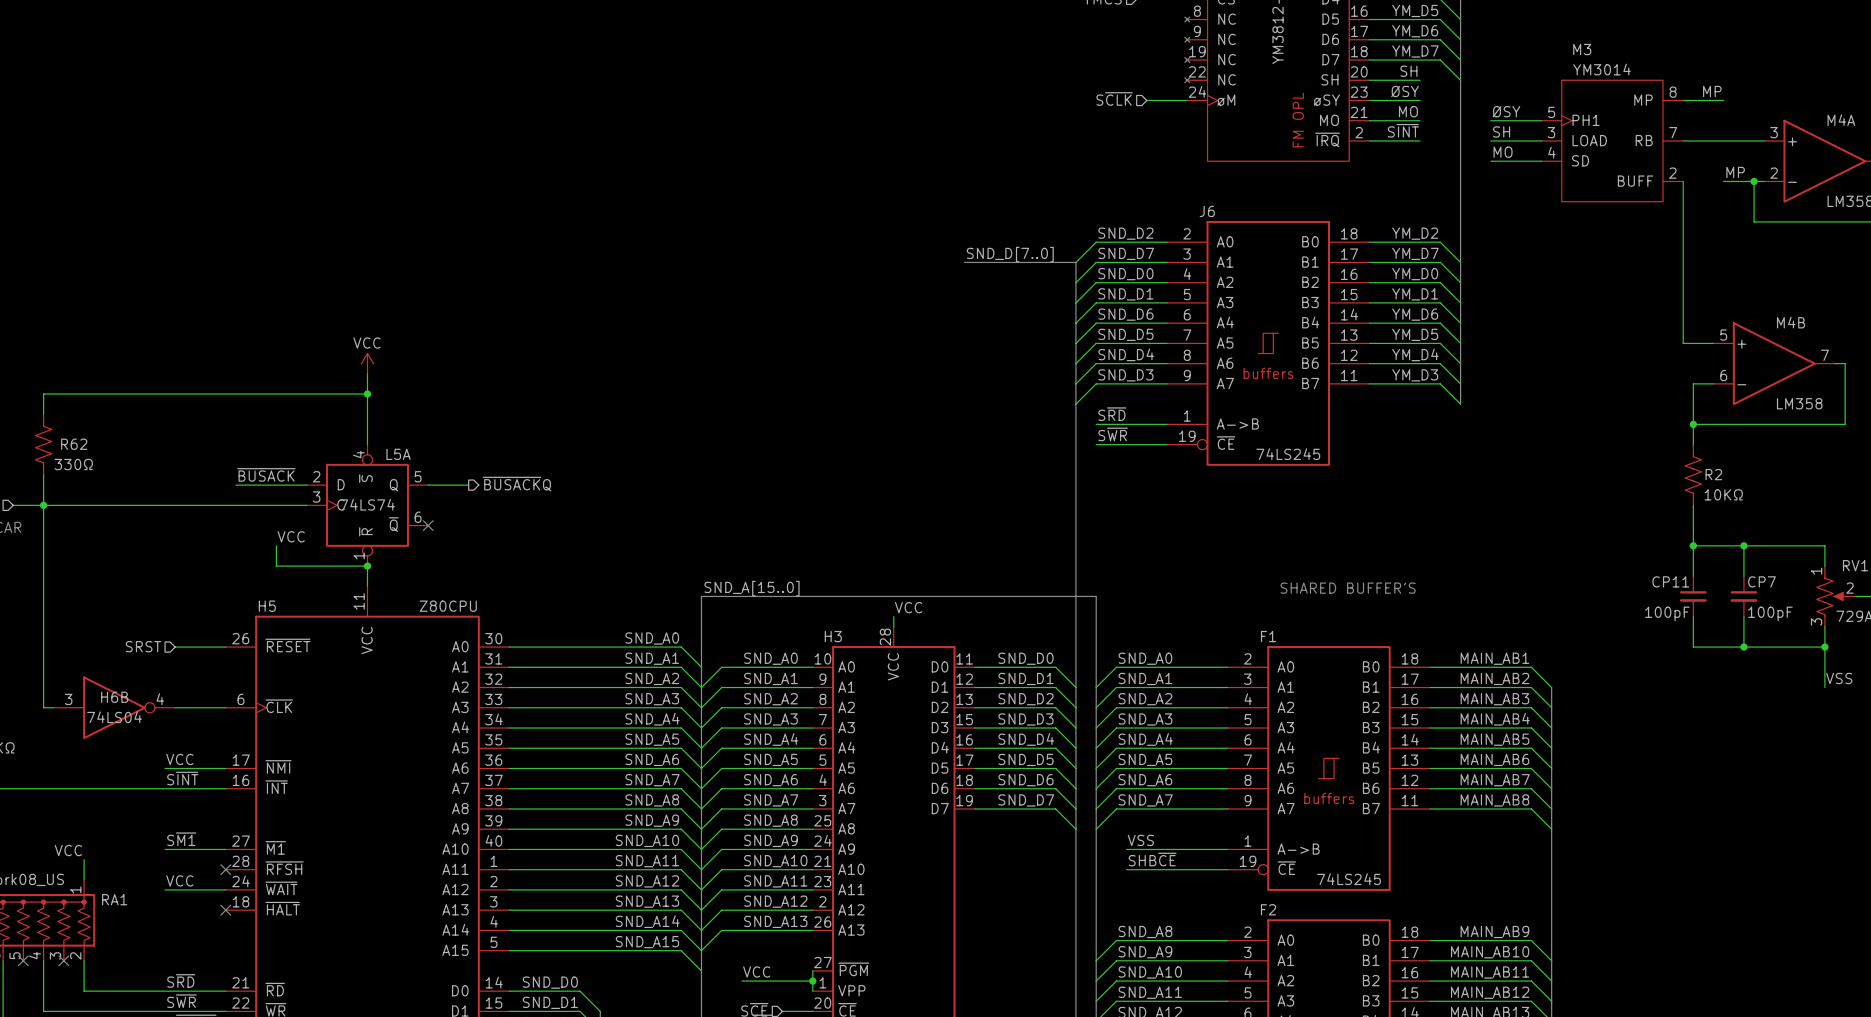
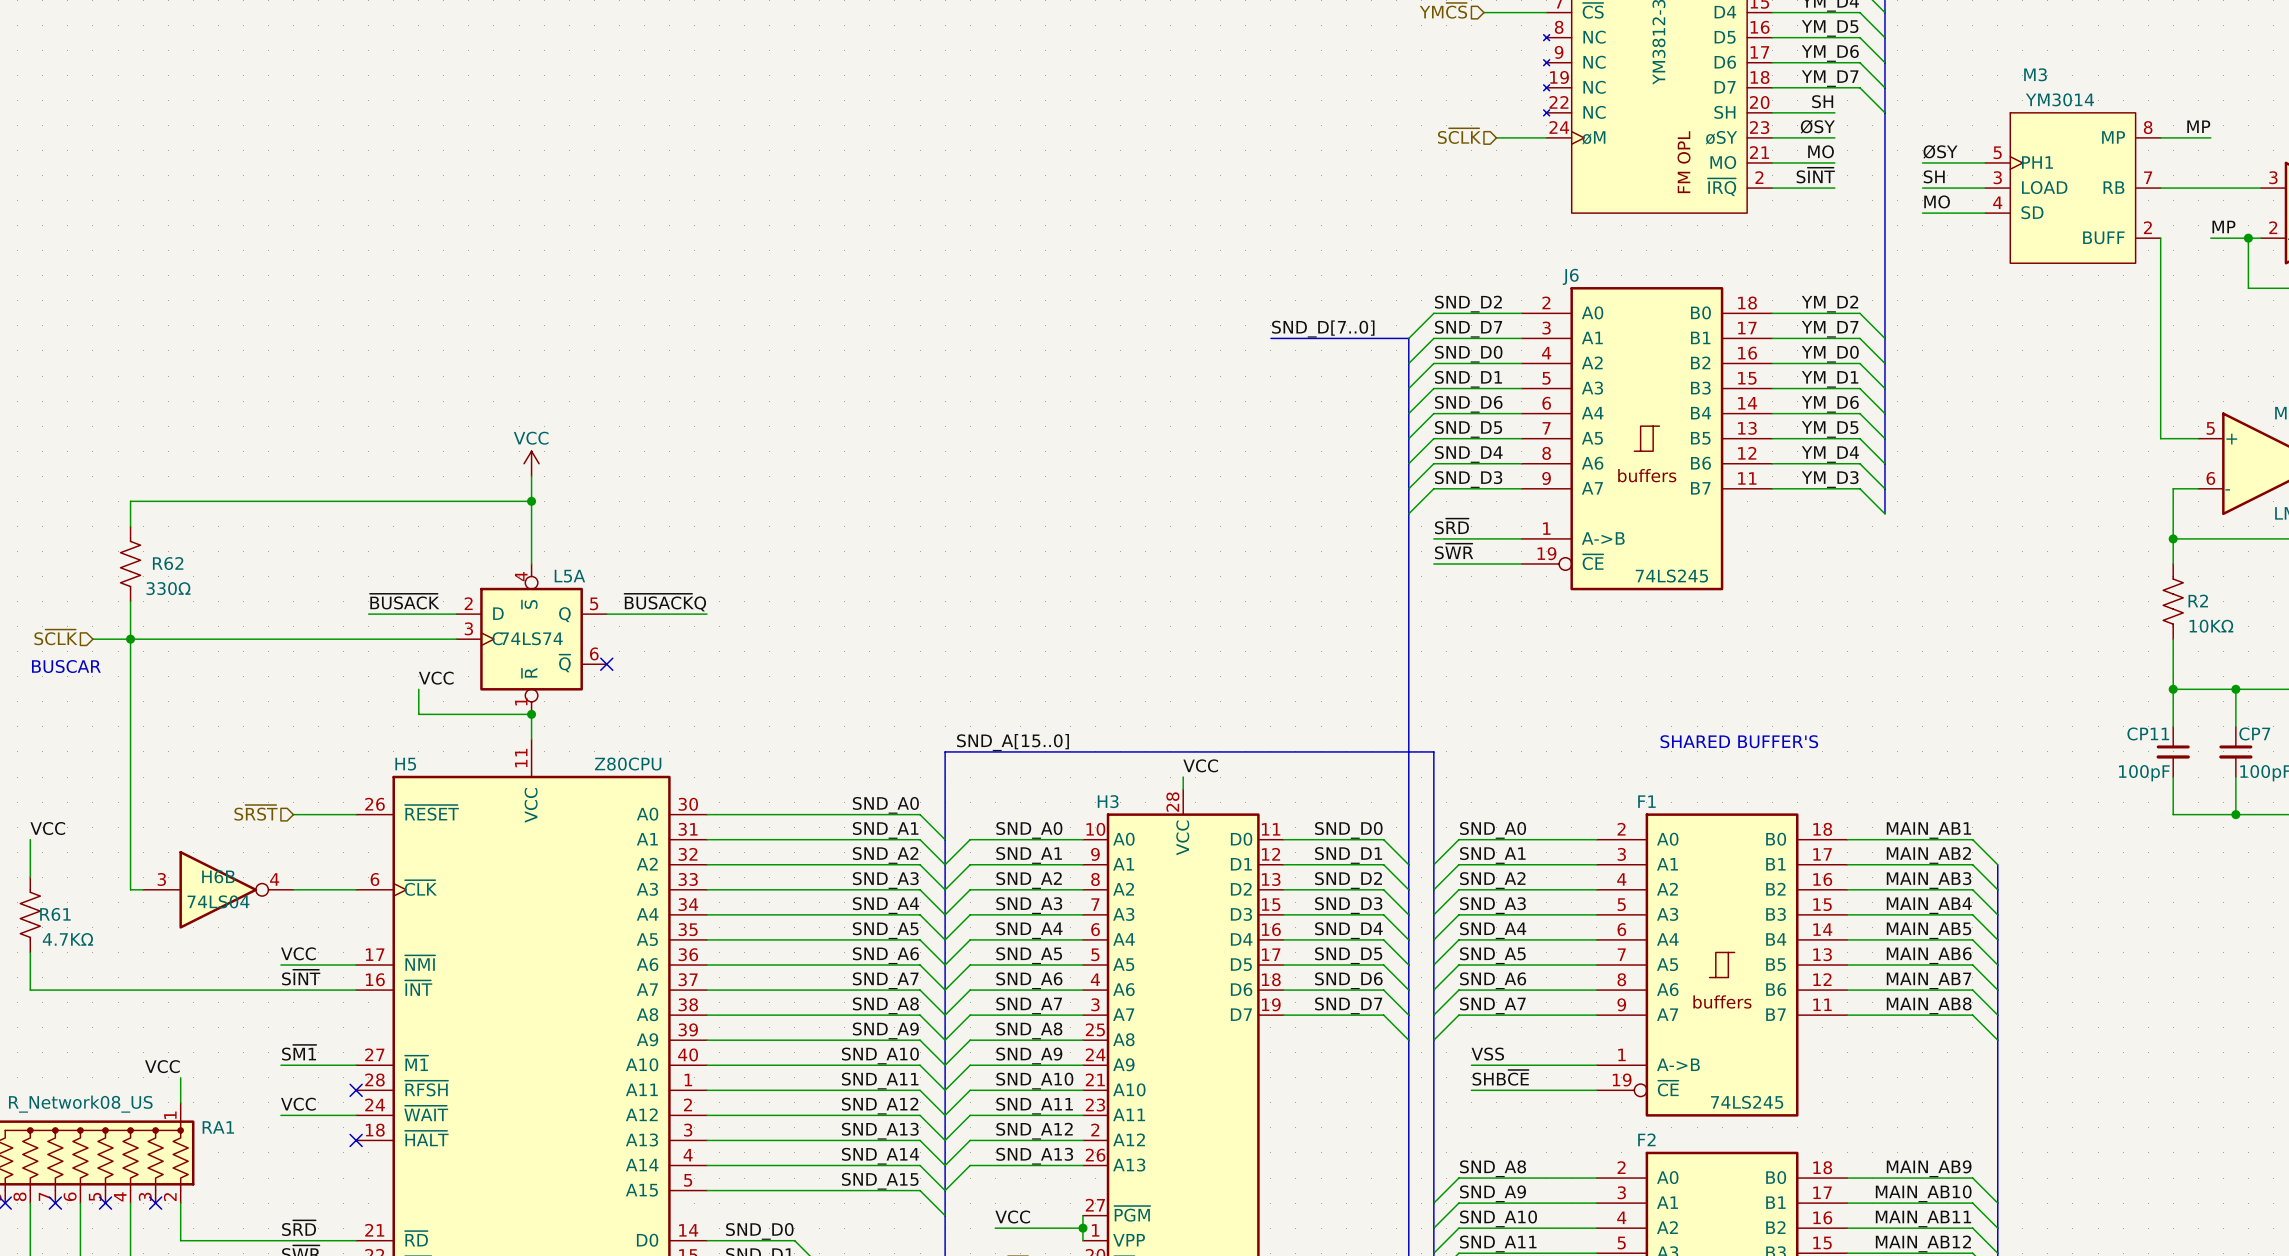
label: none -> ~{BUSACK}Q (665, 602)
hierarchical label: ~{BUSACK}Q (517, 484) -> none
wire: none -> (656, 614) (707, 614)
hierarchical label: SRST (143, 646) -> S~{RST} (256, 812)

